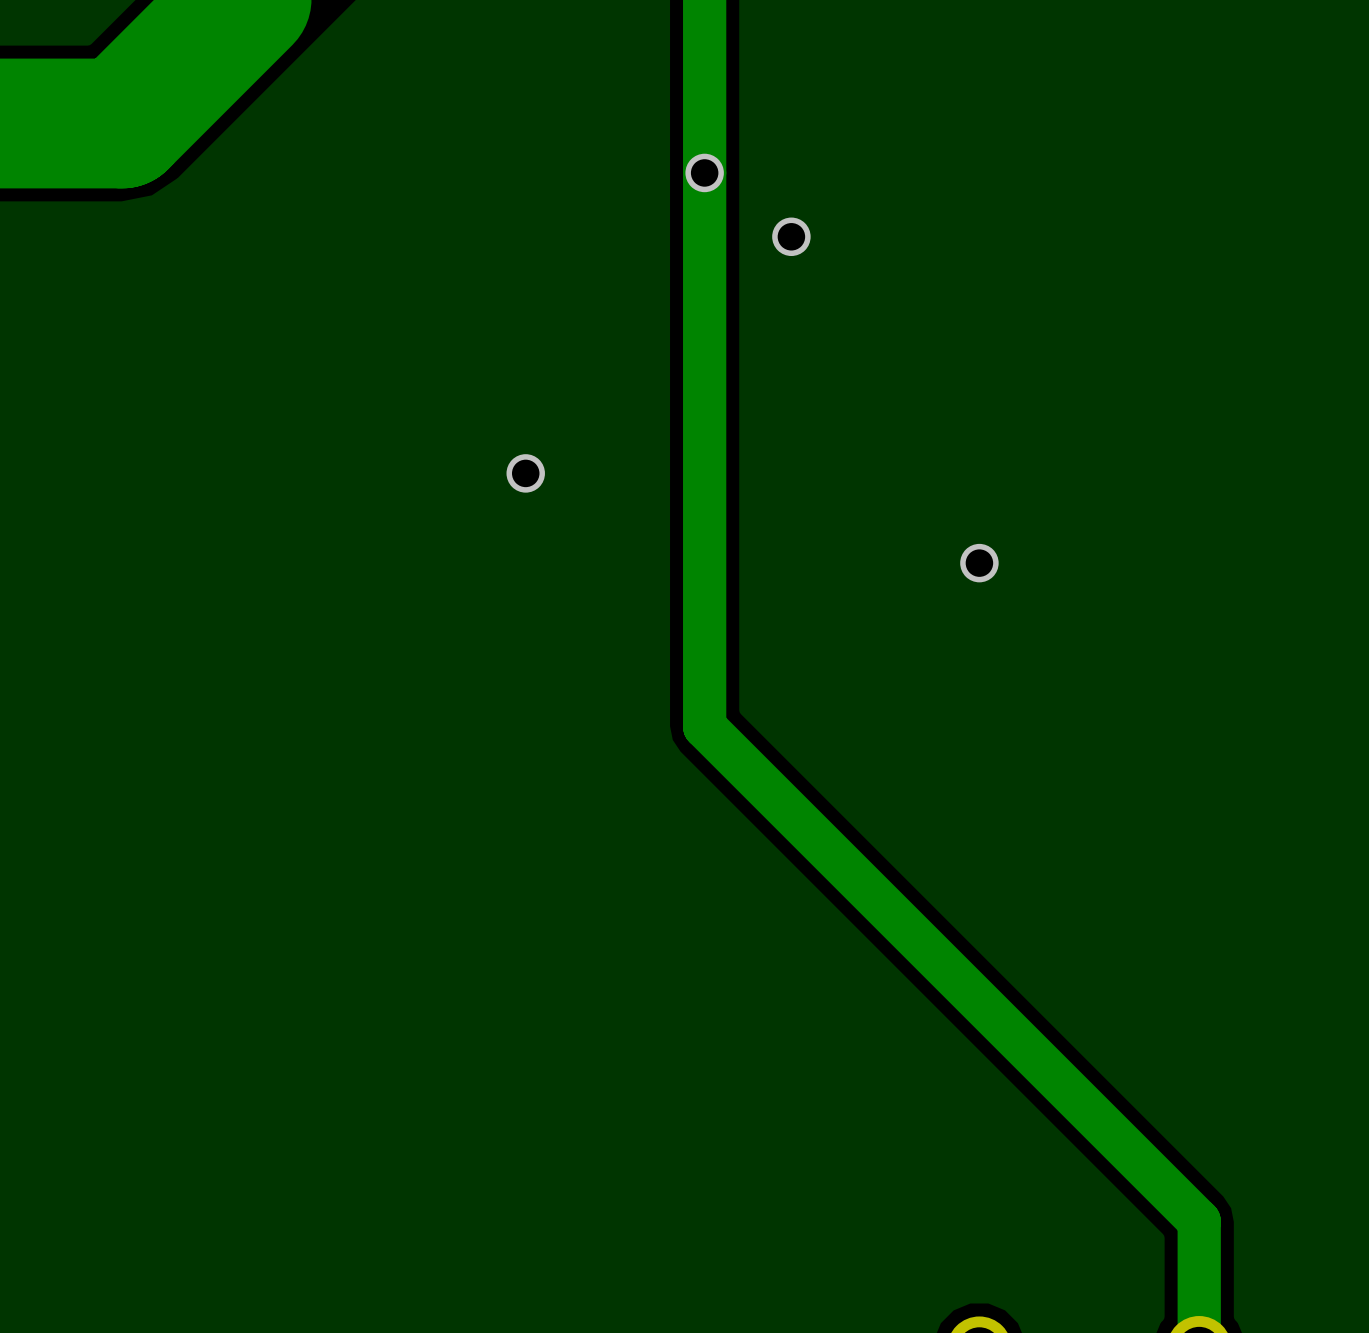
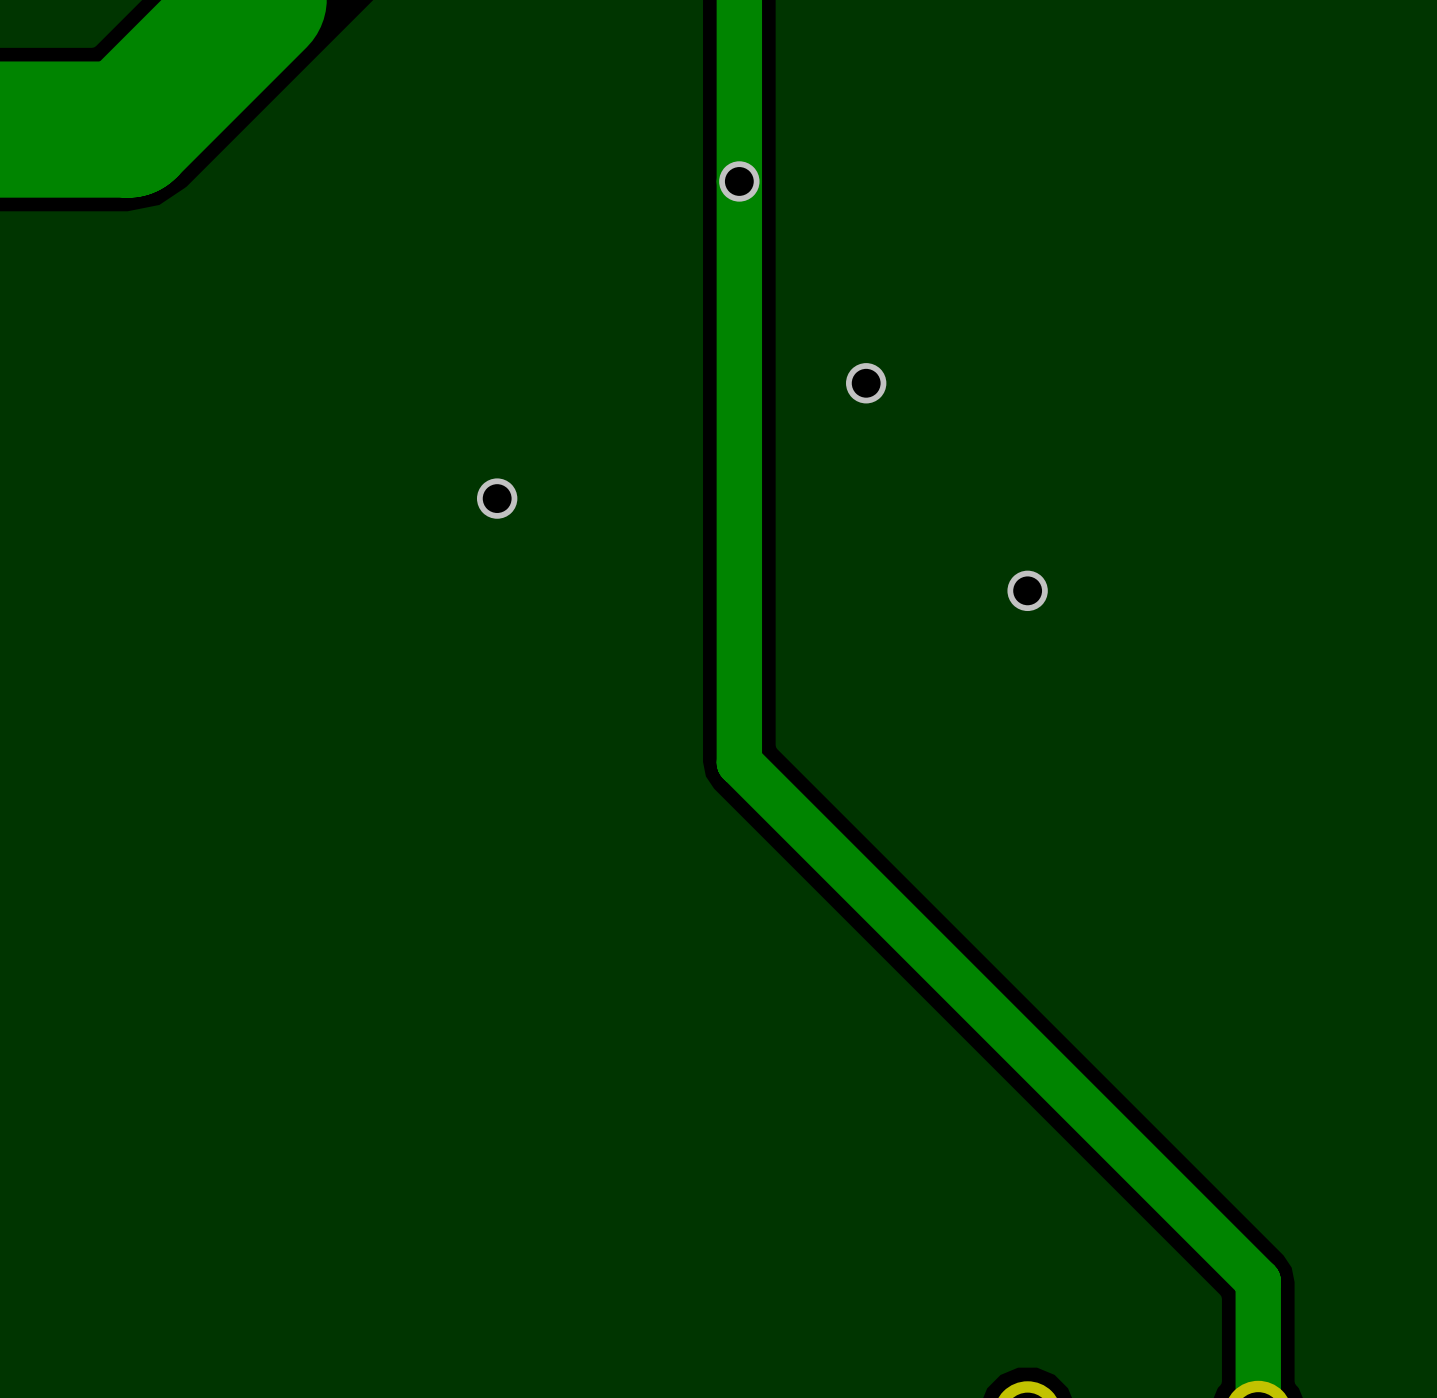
via position: (791, 236) -> (866, 383)
via position: (525, 473) -> (497, 498)

